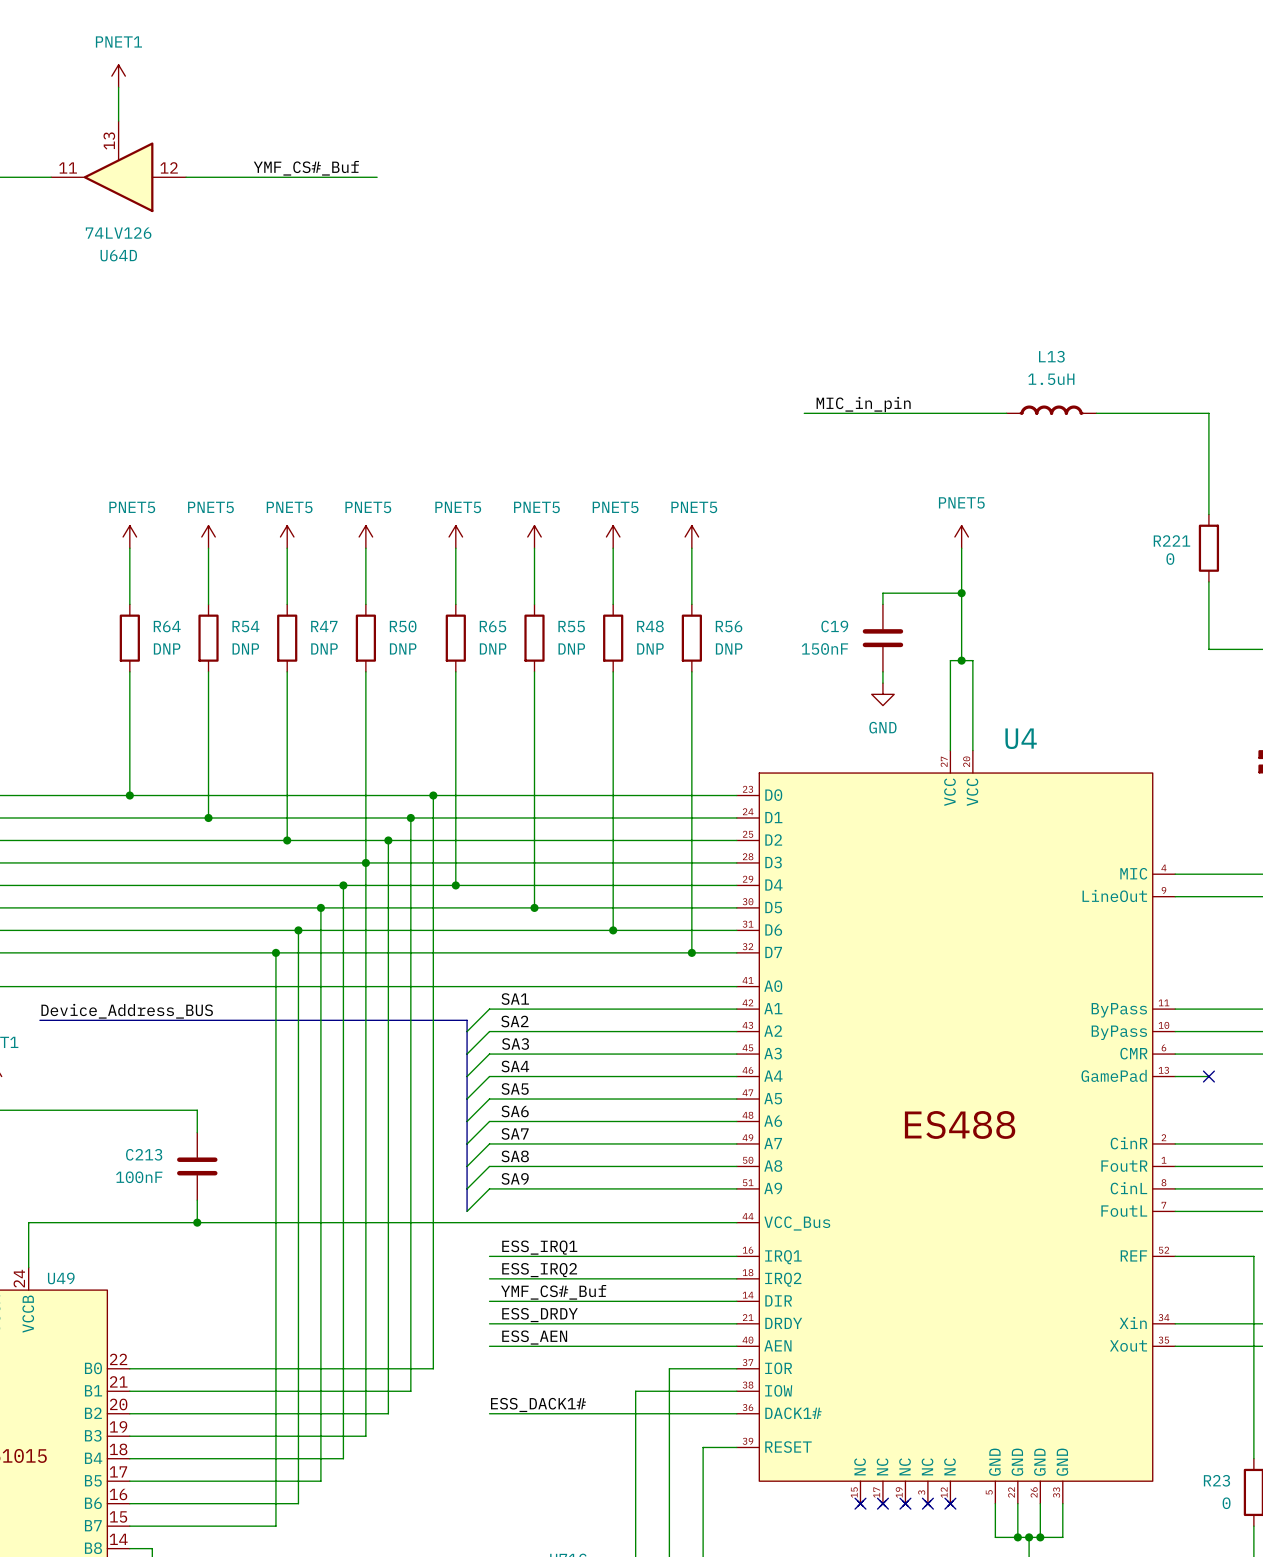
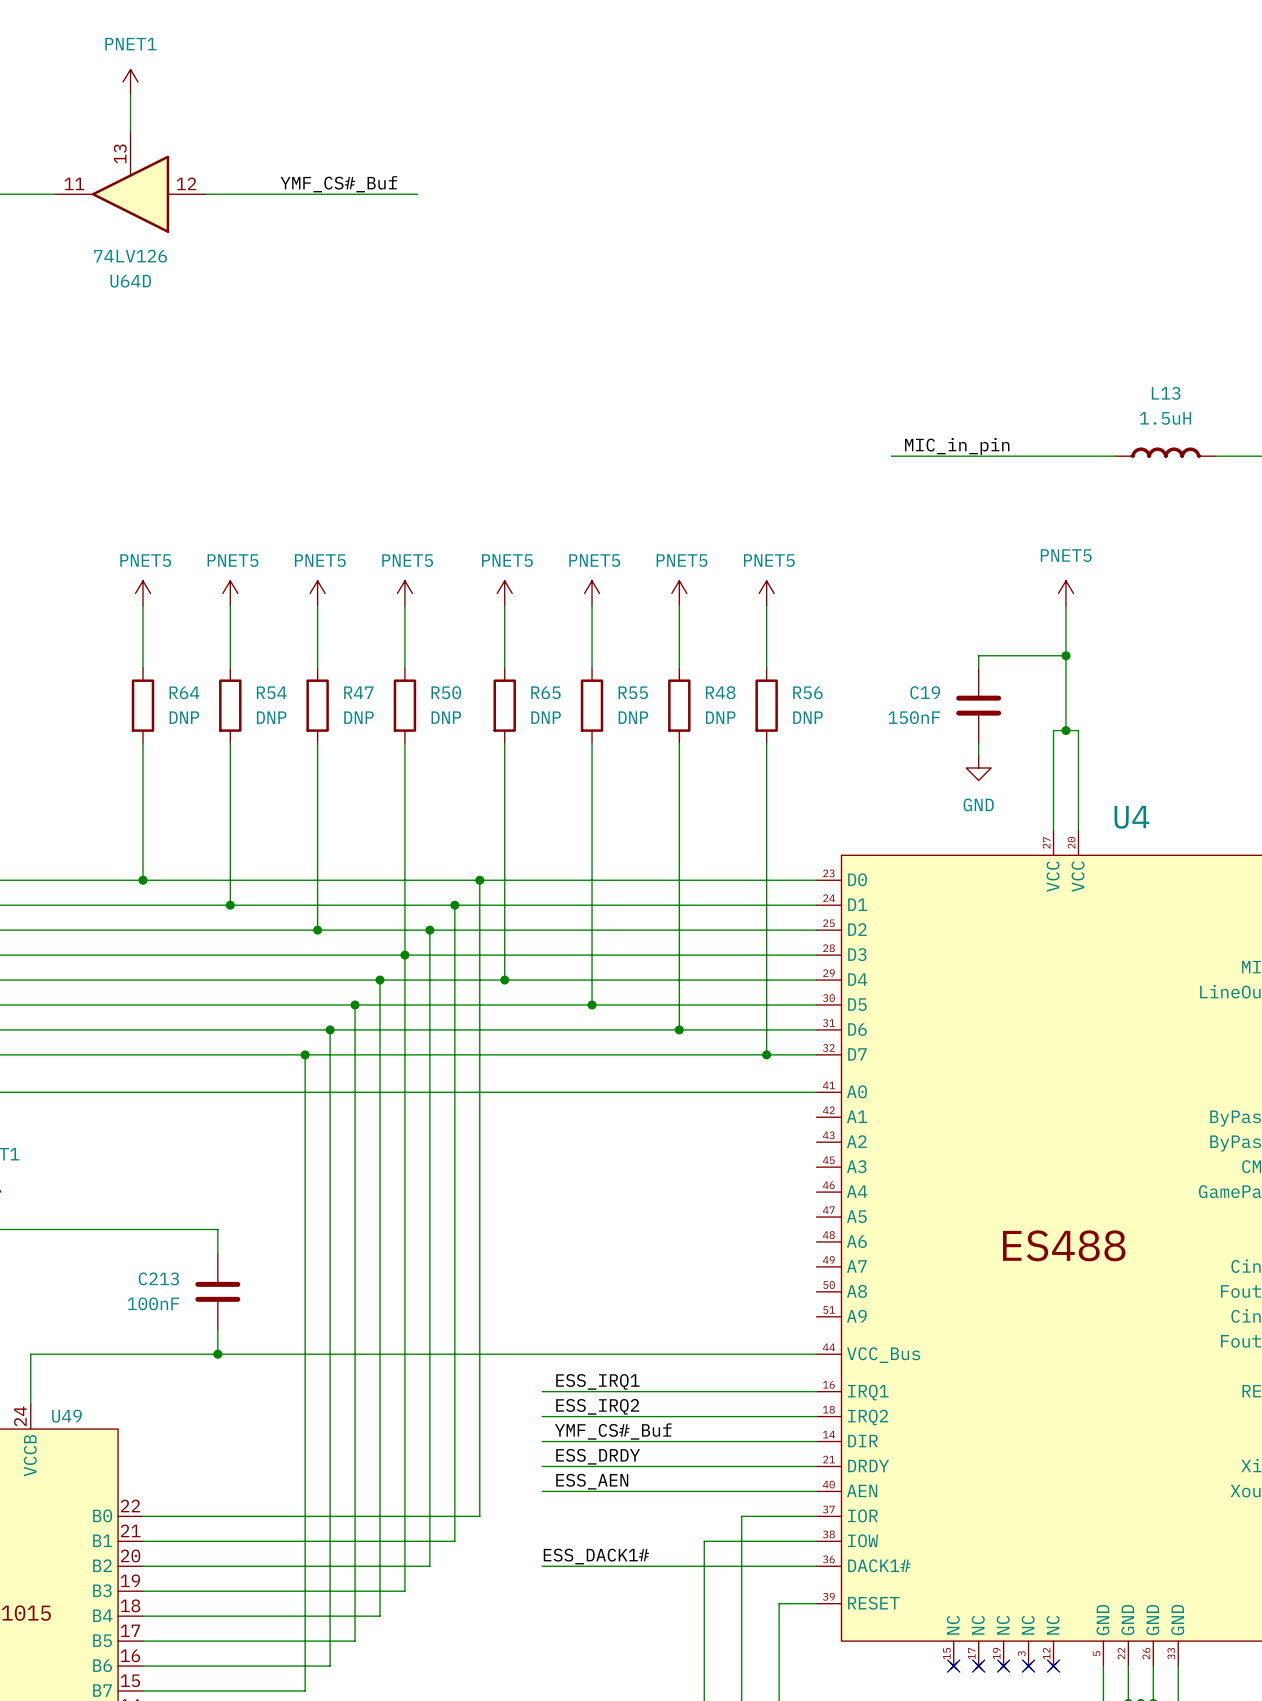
label: SA1 (515, 999) -> none
wire: (736, 1009) (489, 1009) (467, 1031) -> none
label: Device_Address_BUS (127, 1011) -> none
bus: (39, 1020) (467, 1020) (467, 1211) -> none
label: SA2 (514, 1021) -> none
wire: (736, 1031) (489, 1031) (467, 1054) -> none
label: SA3 (515, 1044) -> none
wire: (736, 1054) (489, 1054) (467, 1076) -> none
label: SA4 (515, 1066) -> none
wire: (736, 1076) (489, 1076) (467, 1099) -> none
label: SA5 (515, 1088) -> none
wire: (736, 1099) (489, 1099) (467, 1121) -> none
label: SA6 (515, 1111) -> none
wire: (736, 1121) (489, 1121) (467, 1143) -> none
label: SA7 (515, 1133) -> none
wire: (736, 1143) (489, 1143) (467, 1166) -> none
label: SA8 (515, 1156) -> none
wire: (736, 1166) (489, 1166) (467, 1188) -> none
label: SA9 (515, 1178) -> none
wire: (736, 1188) (489, 1188) (467, 1211) -> none

